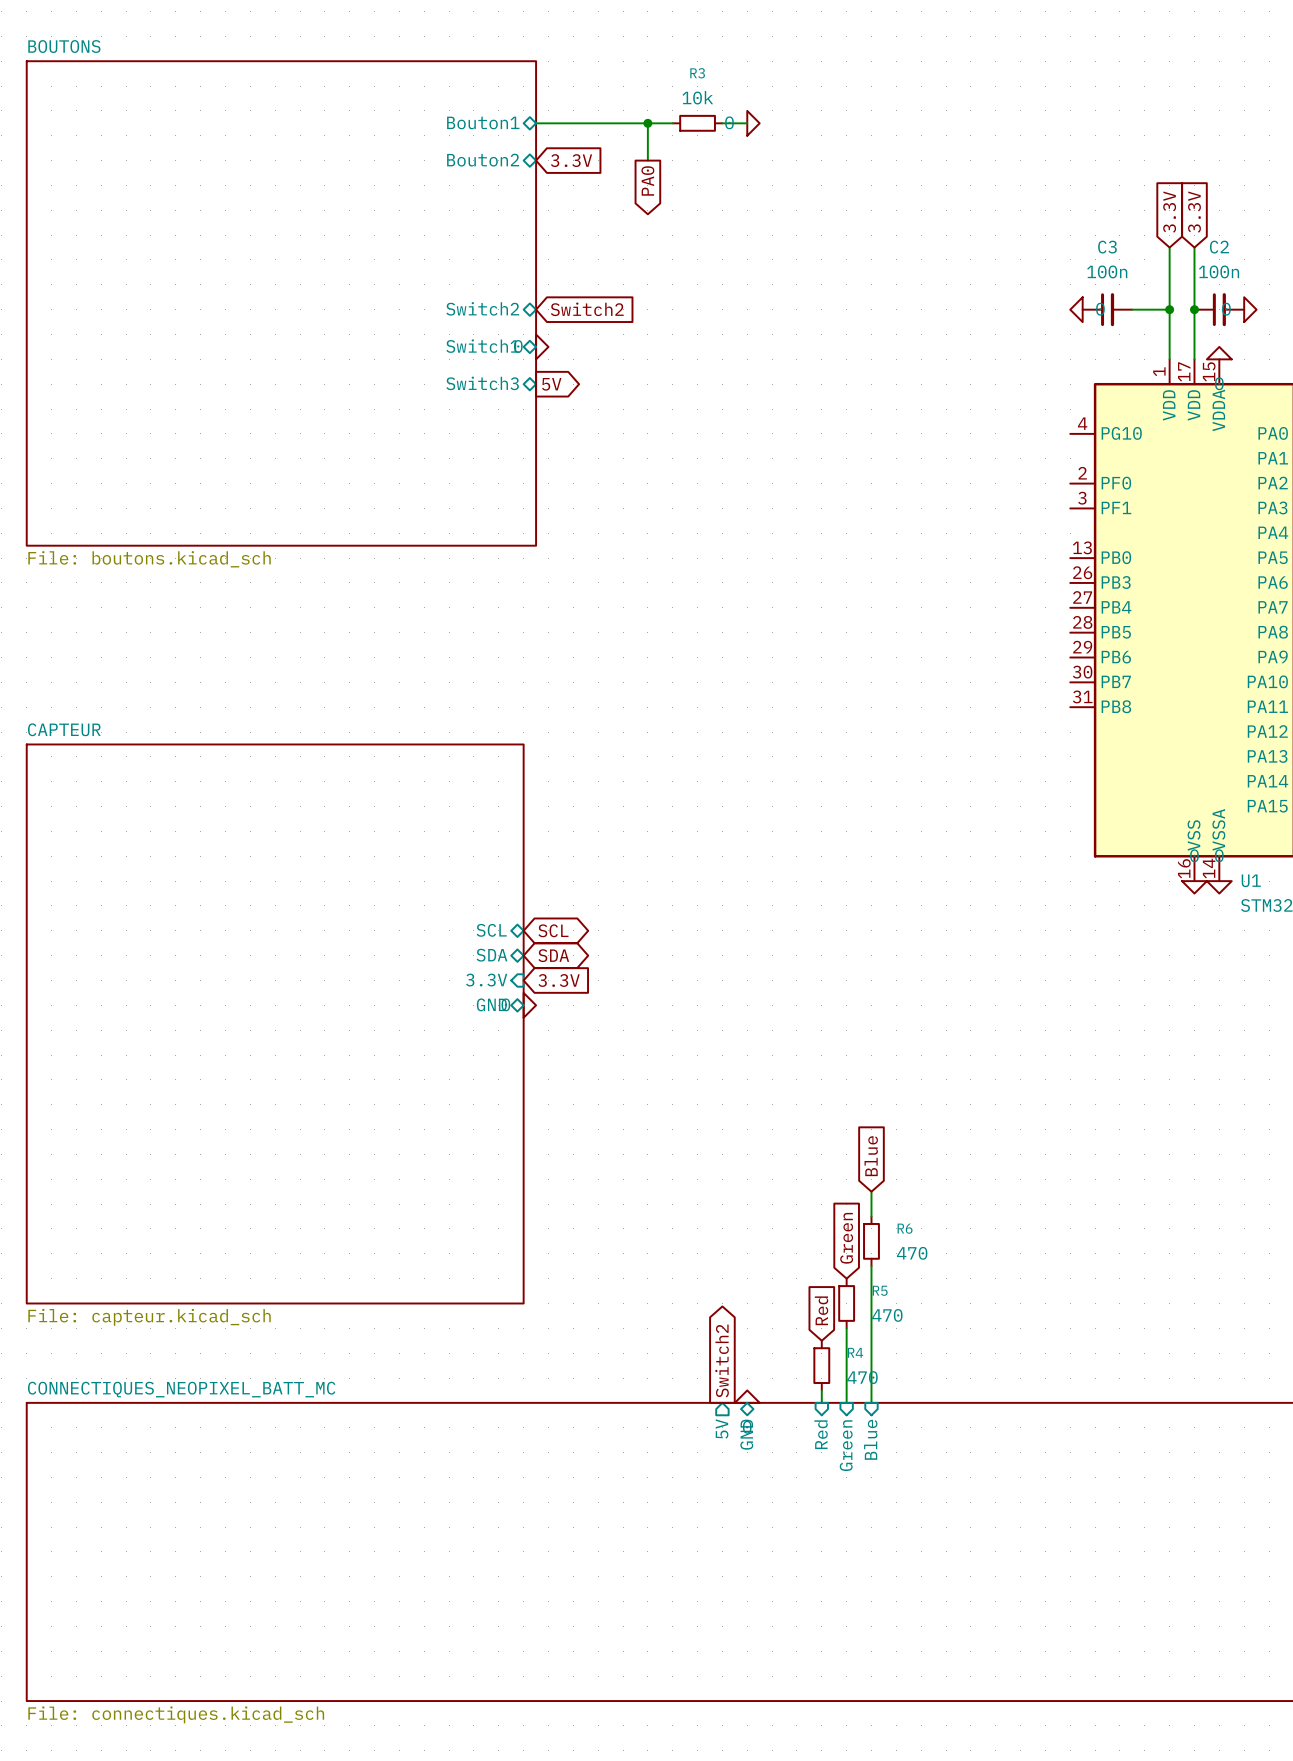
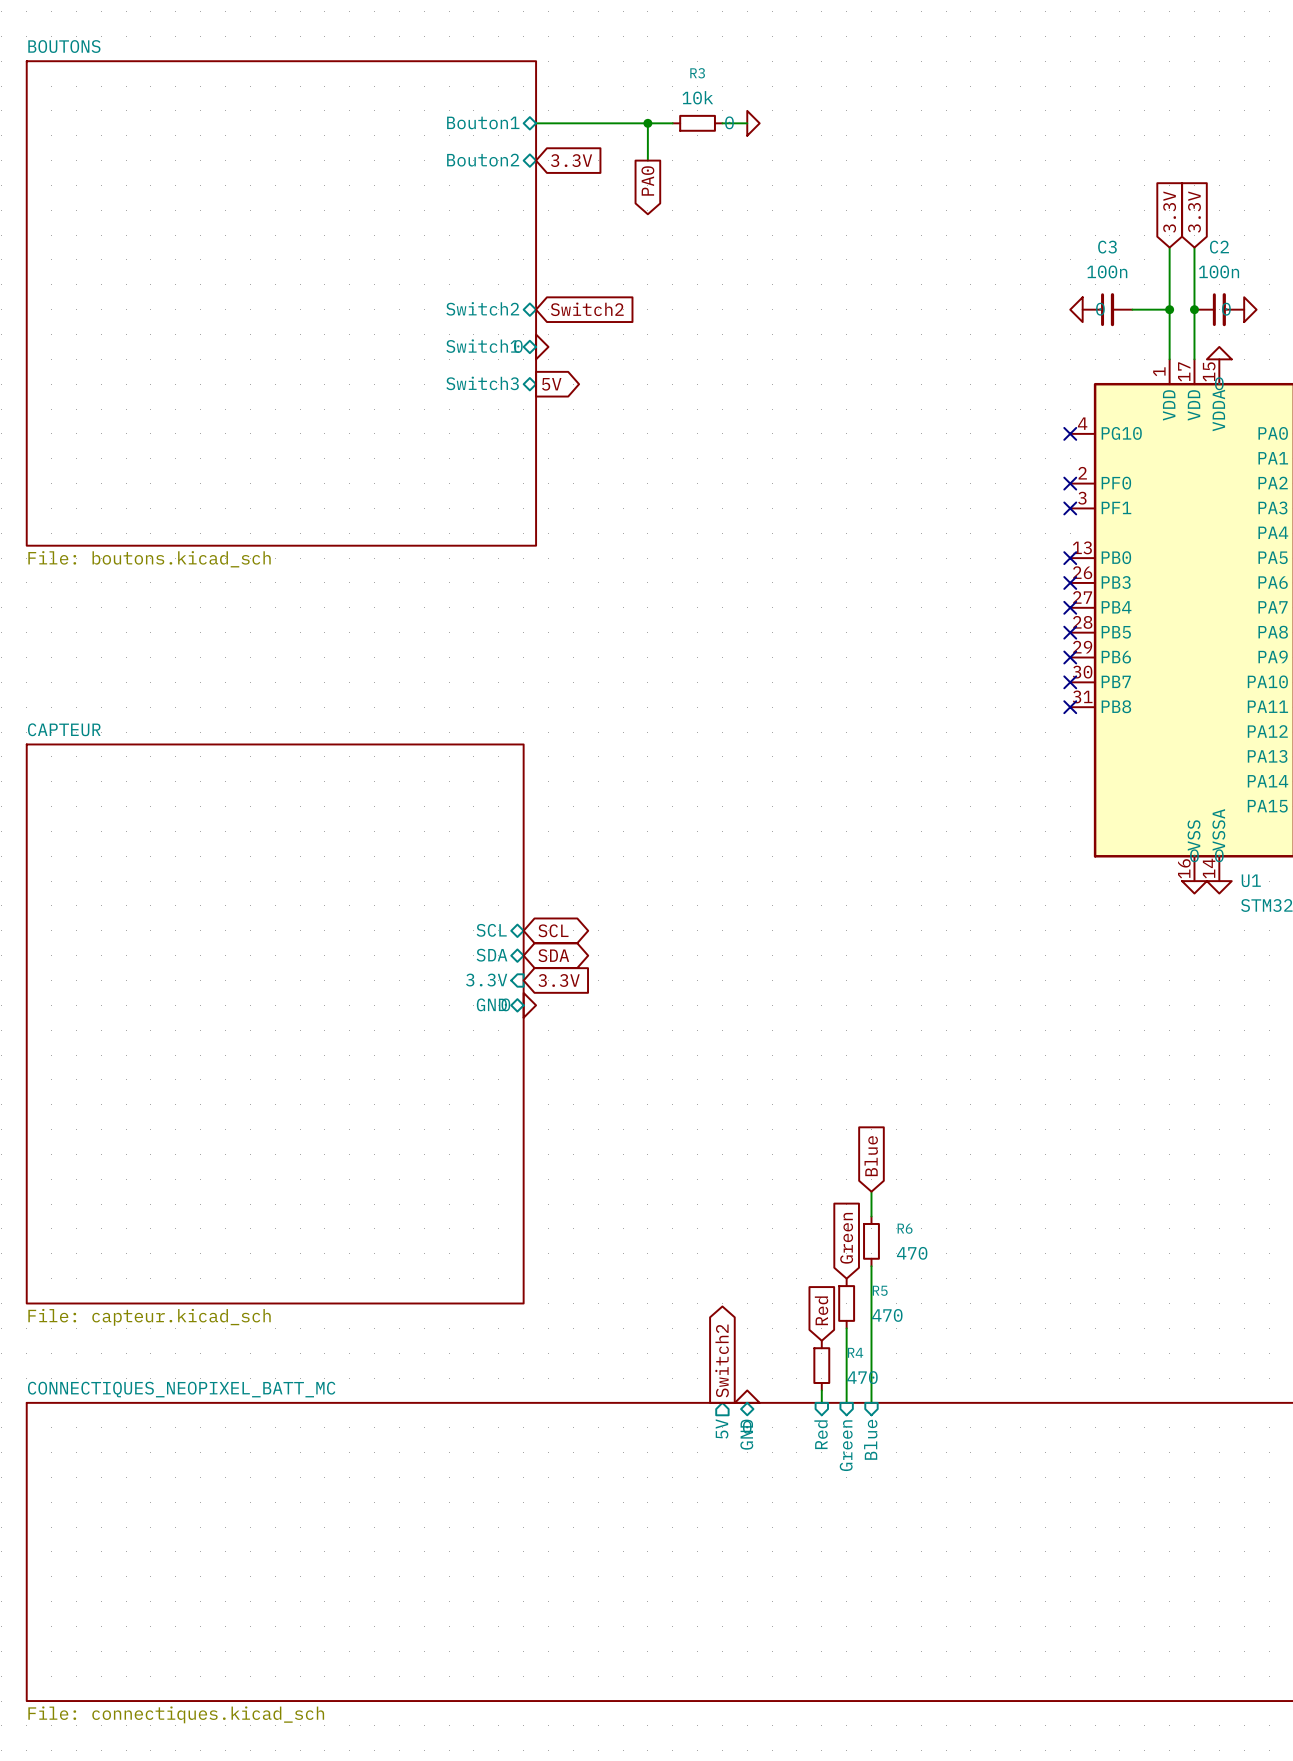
no-connect mark: none -> (1070, 433)
no-connect mark: none -> (1070, 483)
no-connect mark: none -> (1070, 508)
no-connect mark: none -> (1070, 558)
no-connect mark: none -> (1070, 582)
no-connect mark: none -> (1070, 607)
no-connect mark: none -> (1070, 632)
no-connect mark: none -> (1070, 657)
no-connect mark: none -> (1070, 682)
no-connect mark: none -> (1070, 707)

